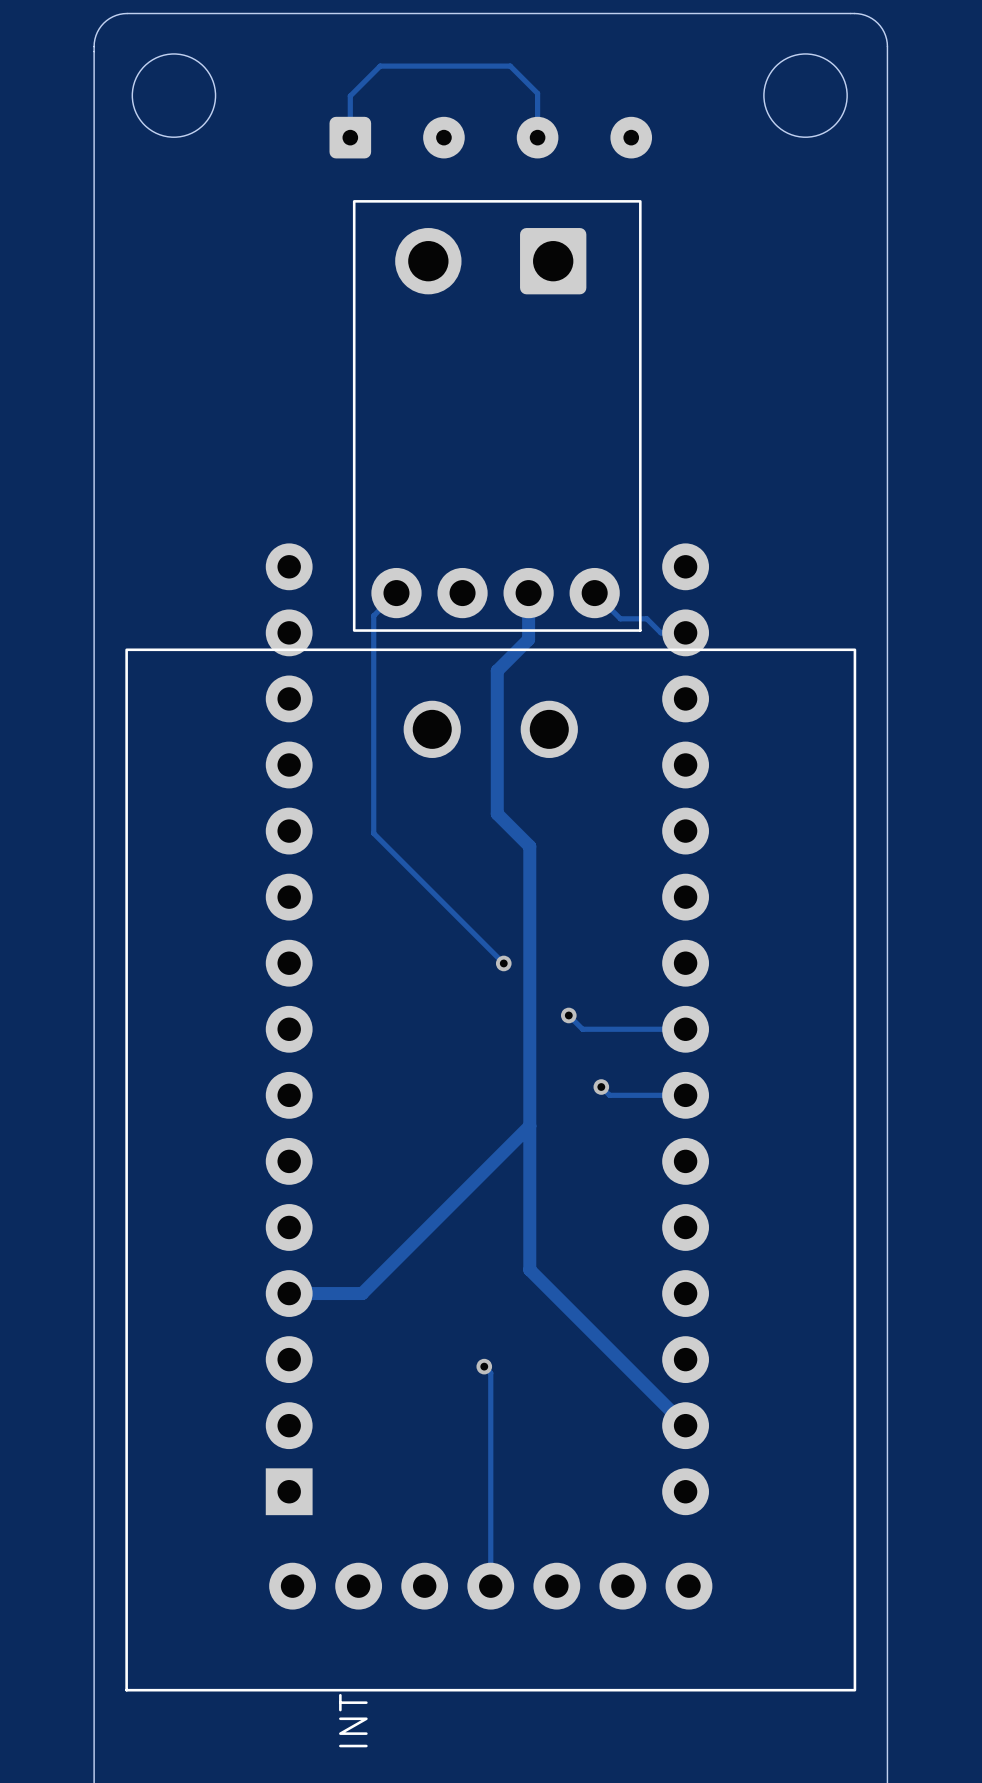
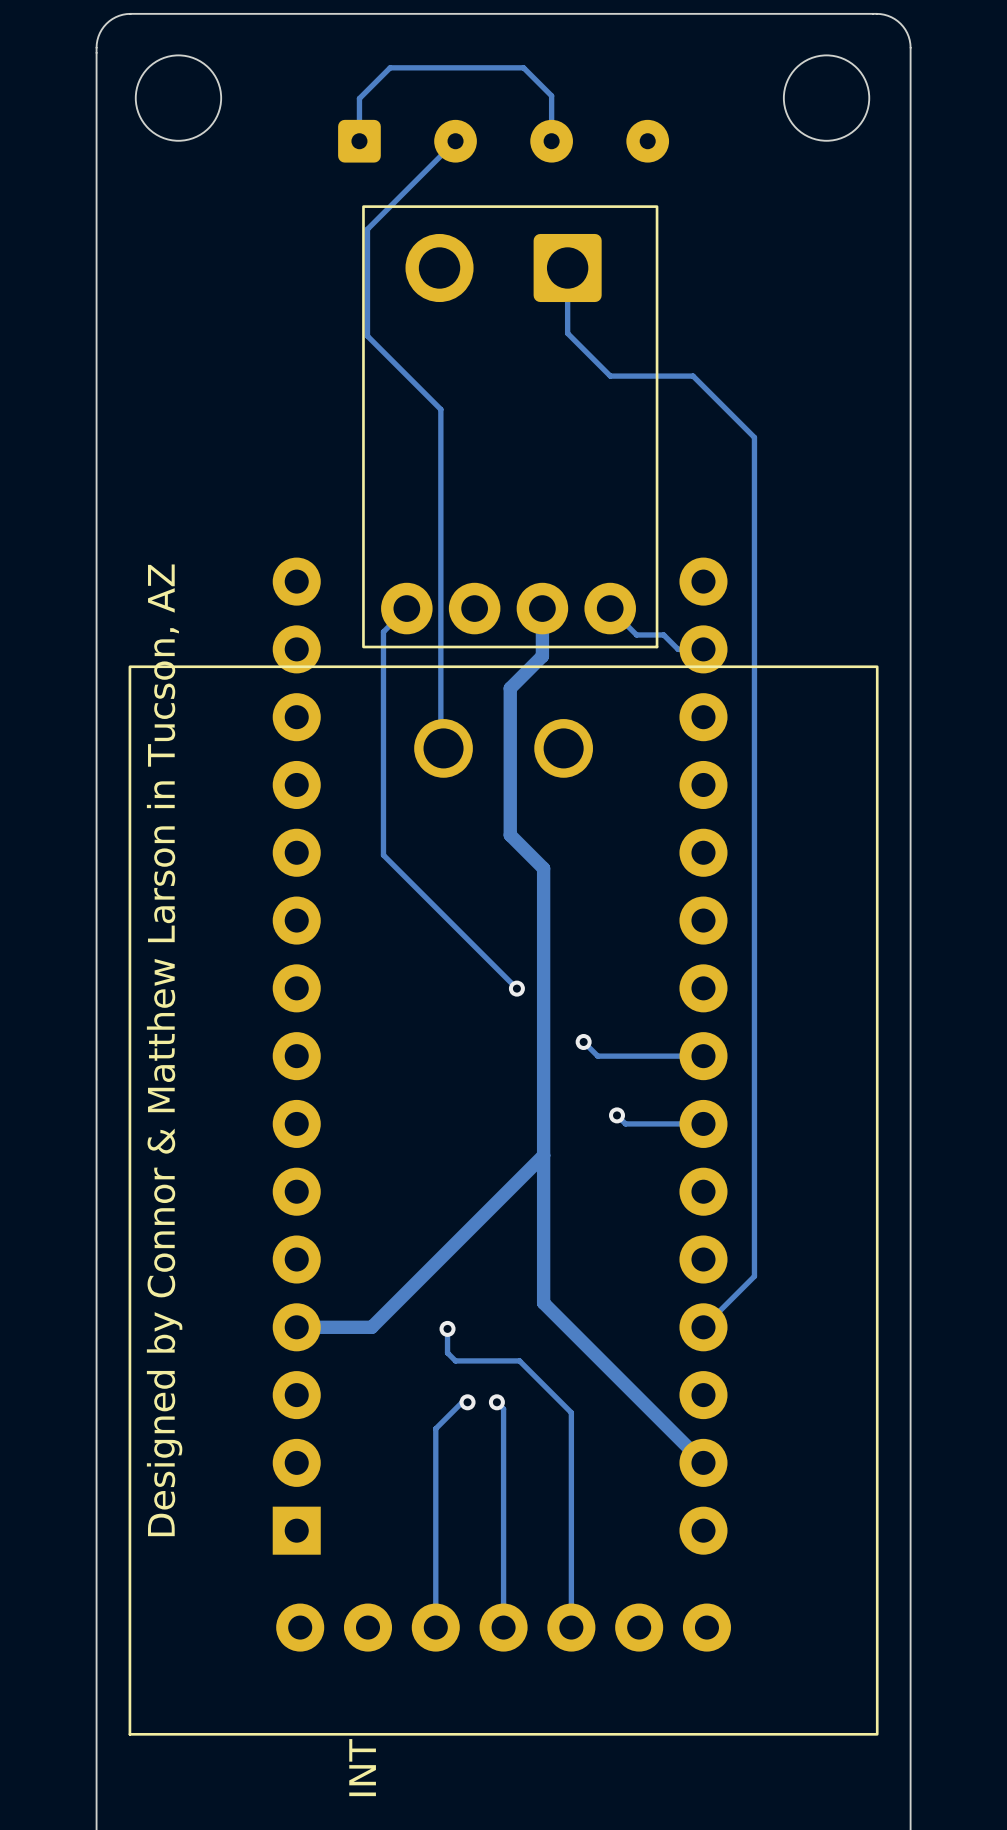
track: none -> (455, 141) (367, 229) (367, 336) (440, 409) (440, 745) (443, 748)
track: none -> (567, 268) (567, 333) (610, 376) (693, 376) (754, 437) (754, 1276) (703, 1327)
text: none -> Designed by Connor & Matthew Larson in Tucson, AZ (164, 1050)
track: none -> (447, 1328) (447, 1352) (455, 1360) (519, 1360) (571, 1412) (571, 1627)
via: none -> (447, 1328)
track: none -> (467, 1402) (462, 1402) (435, 1428) (435, 1627)
via: none -> (467, 1402)

